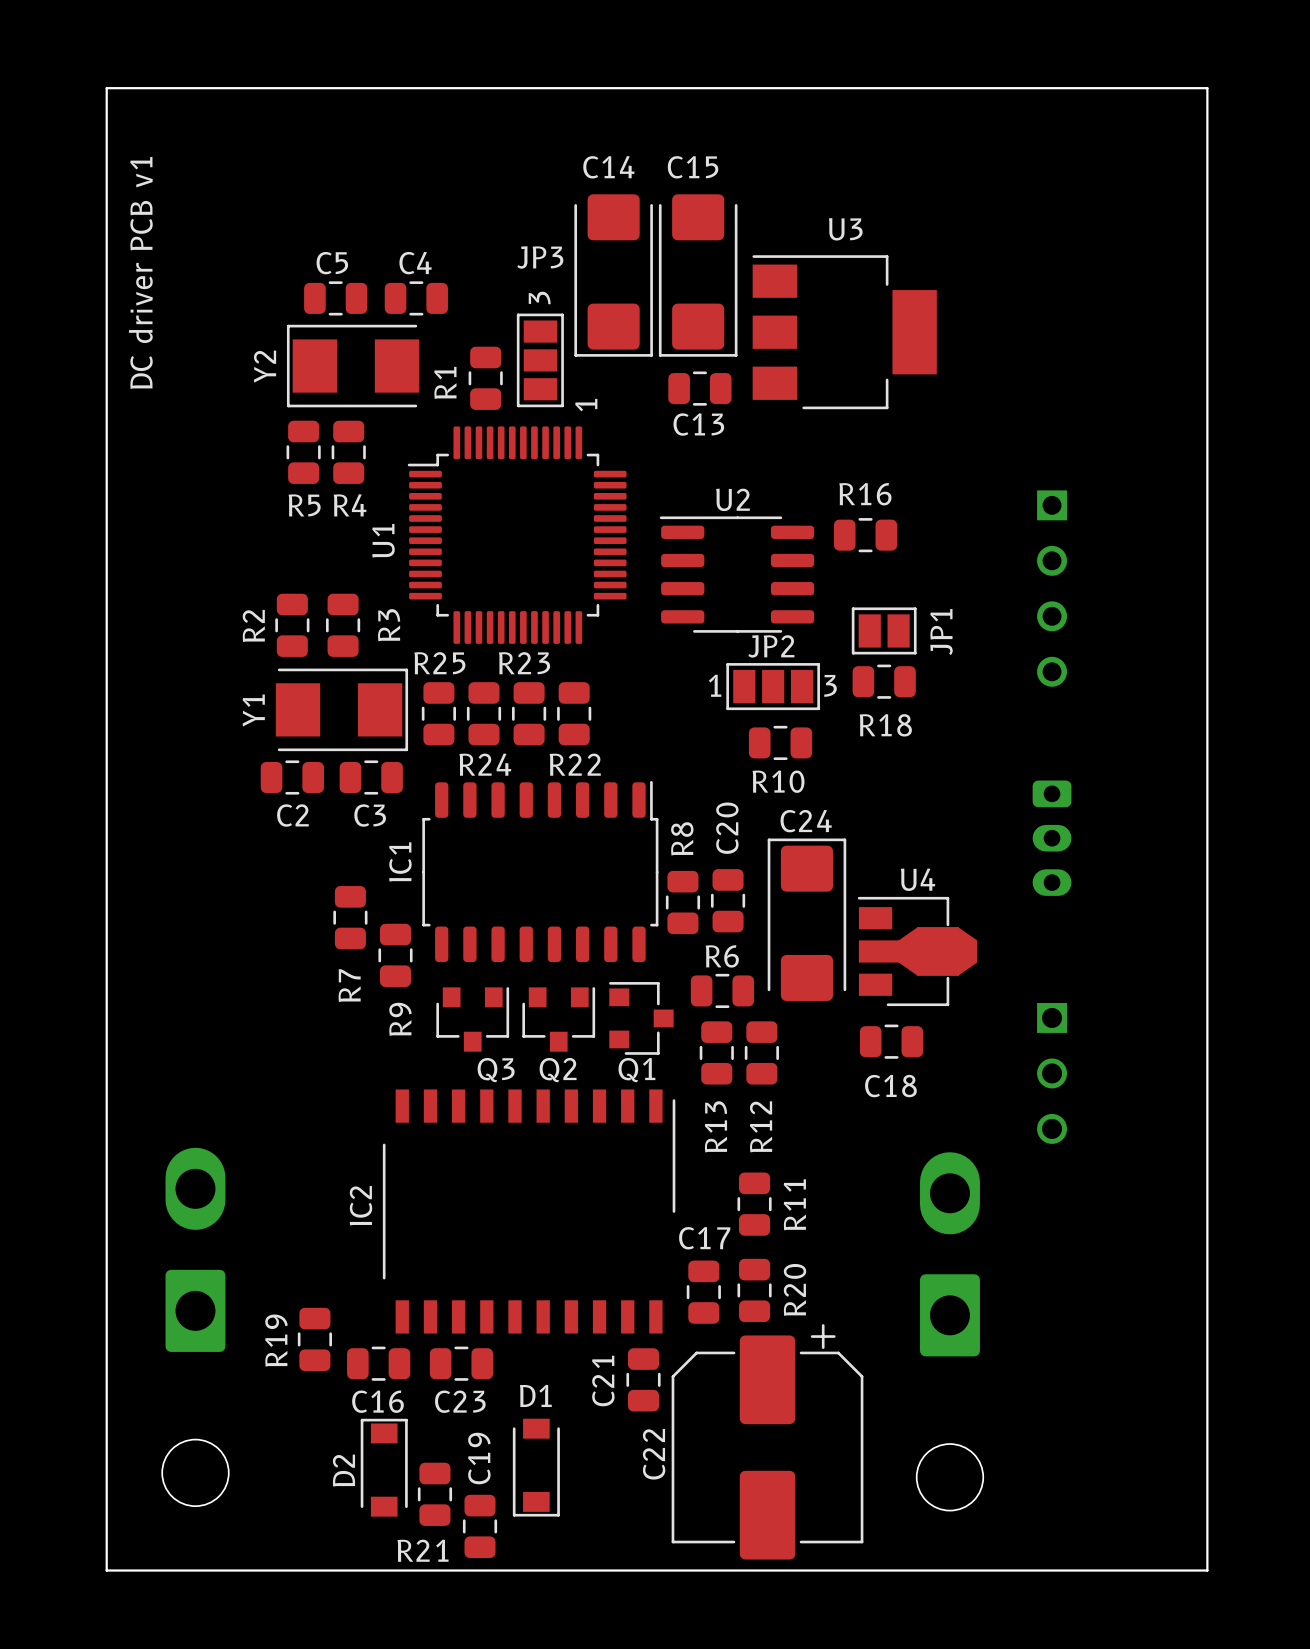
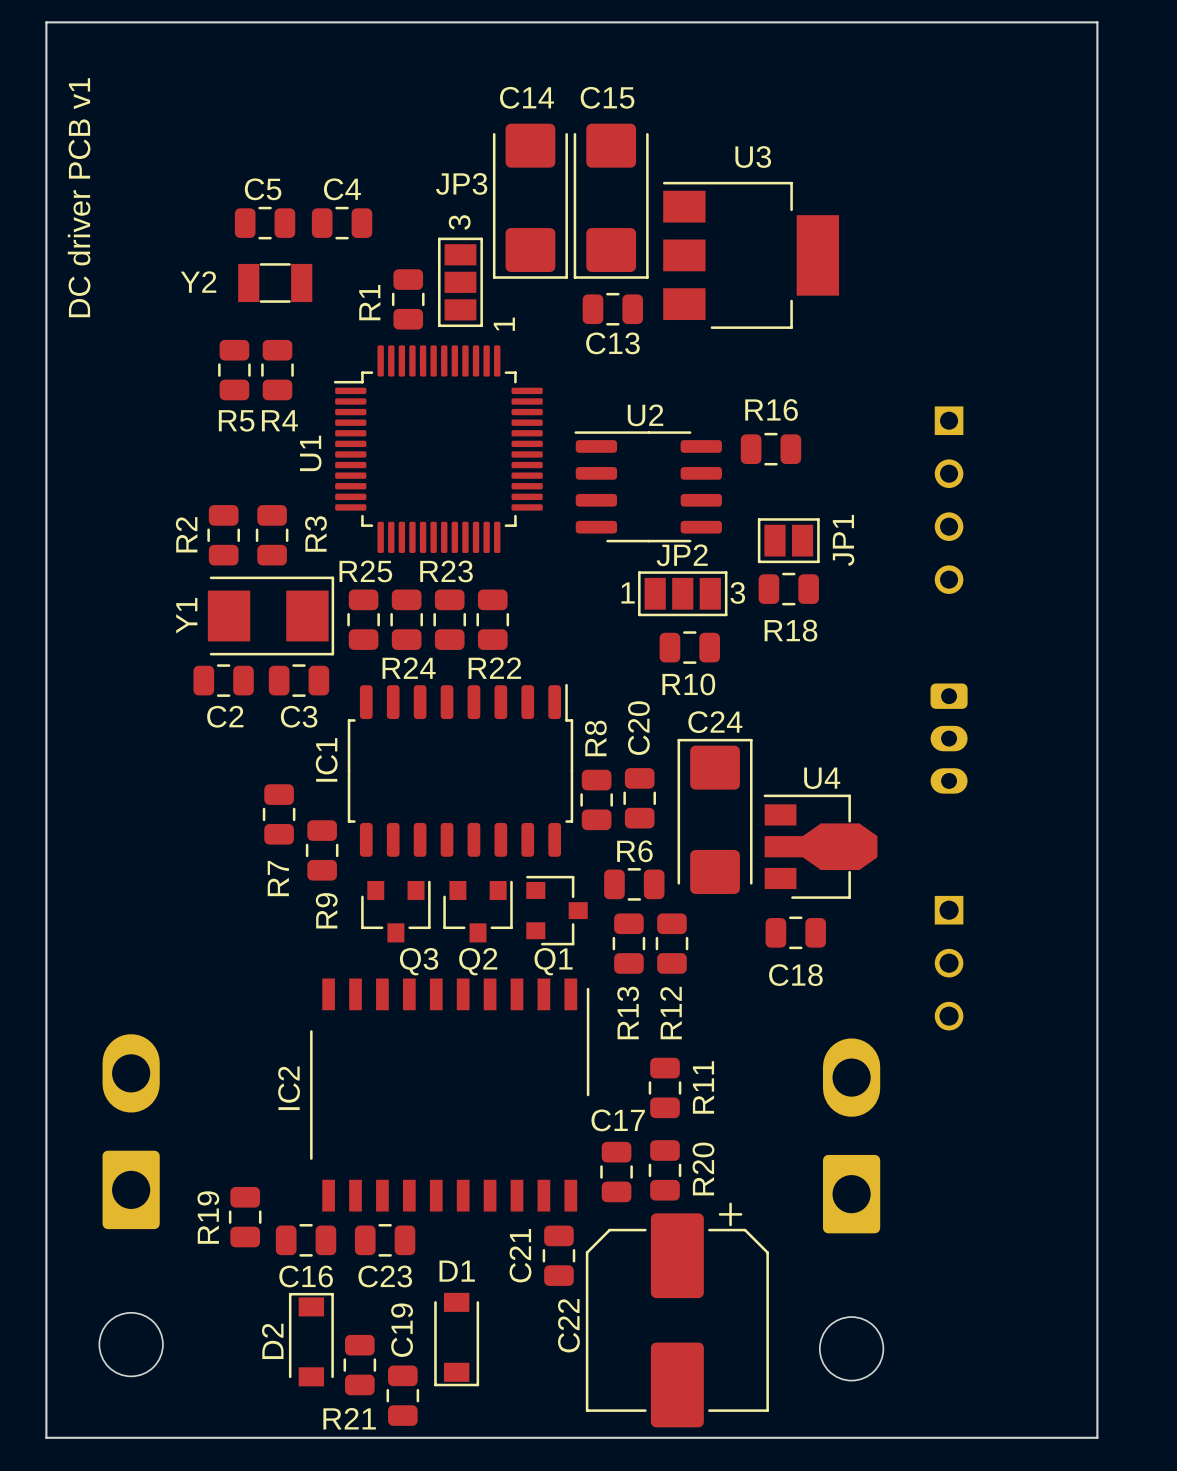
Y2 footprint: [286, 324, 420, 408] -> [238, 263, 313, 303]

